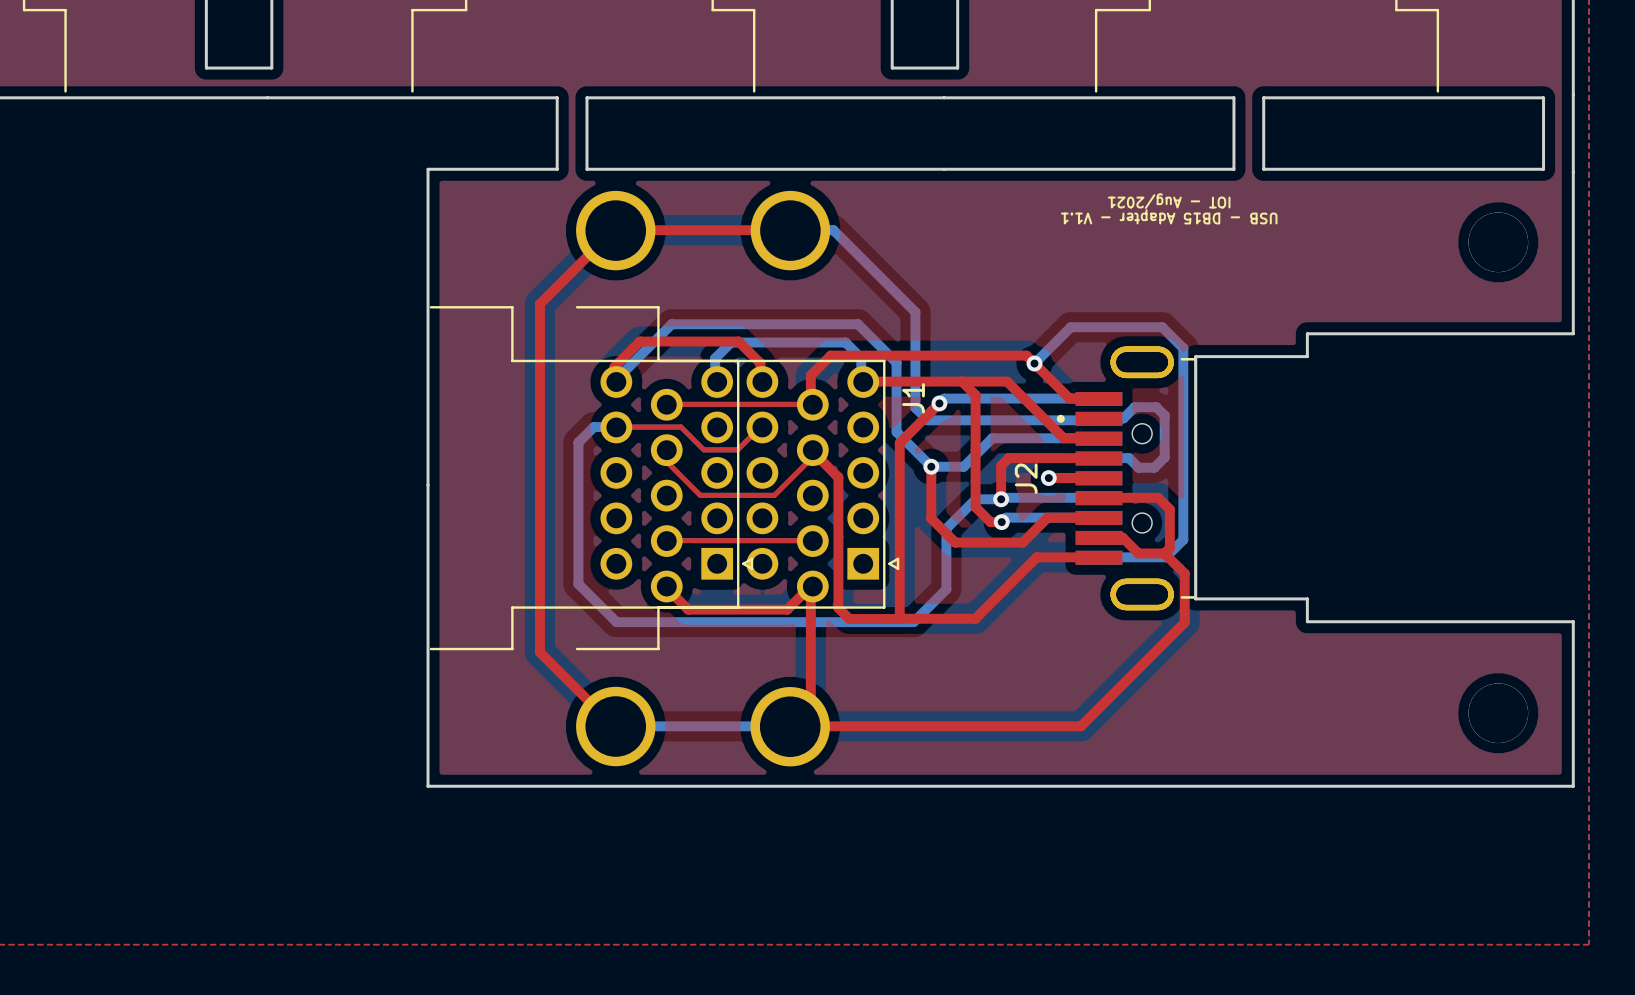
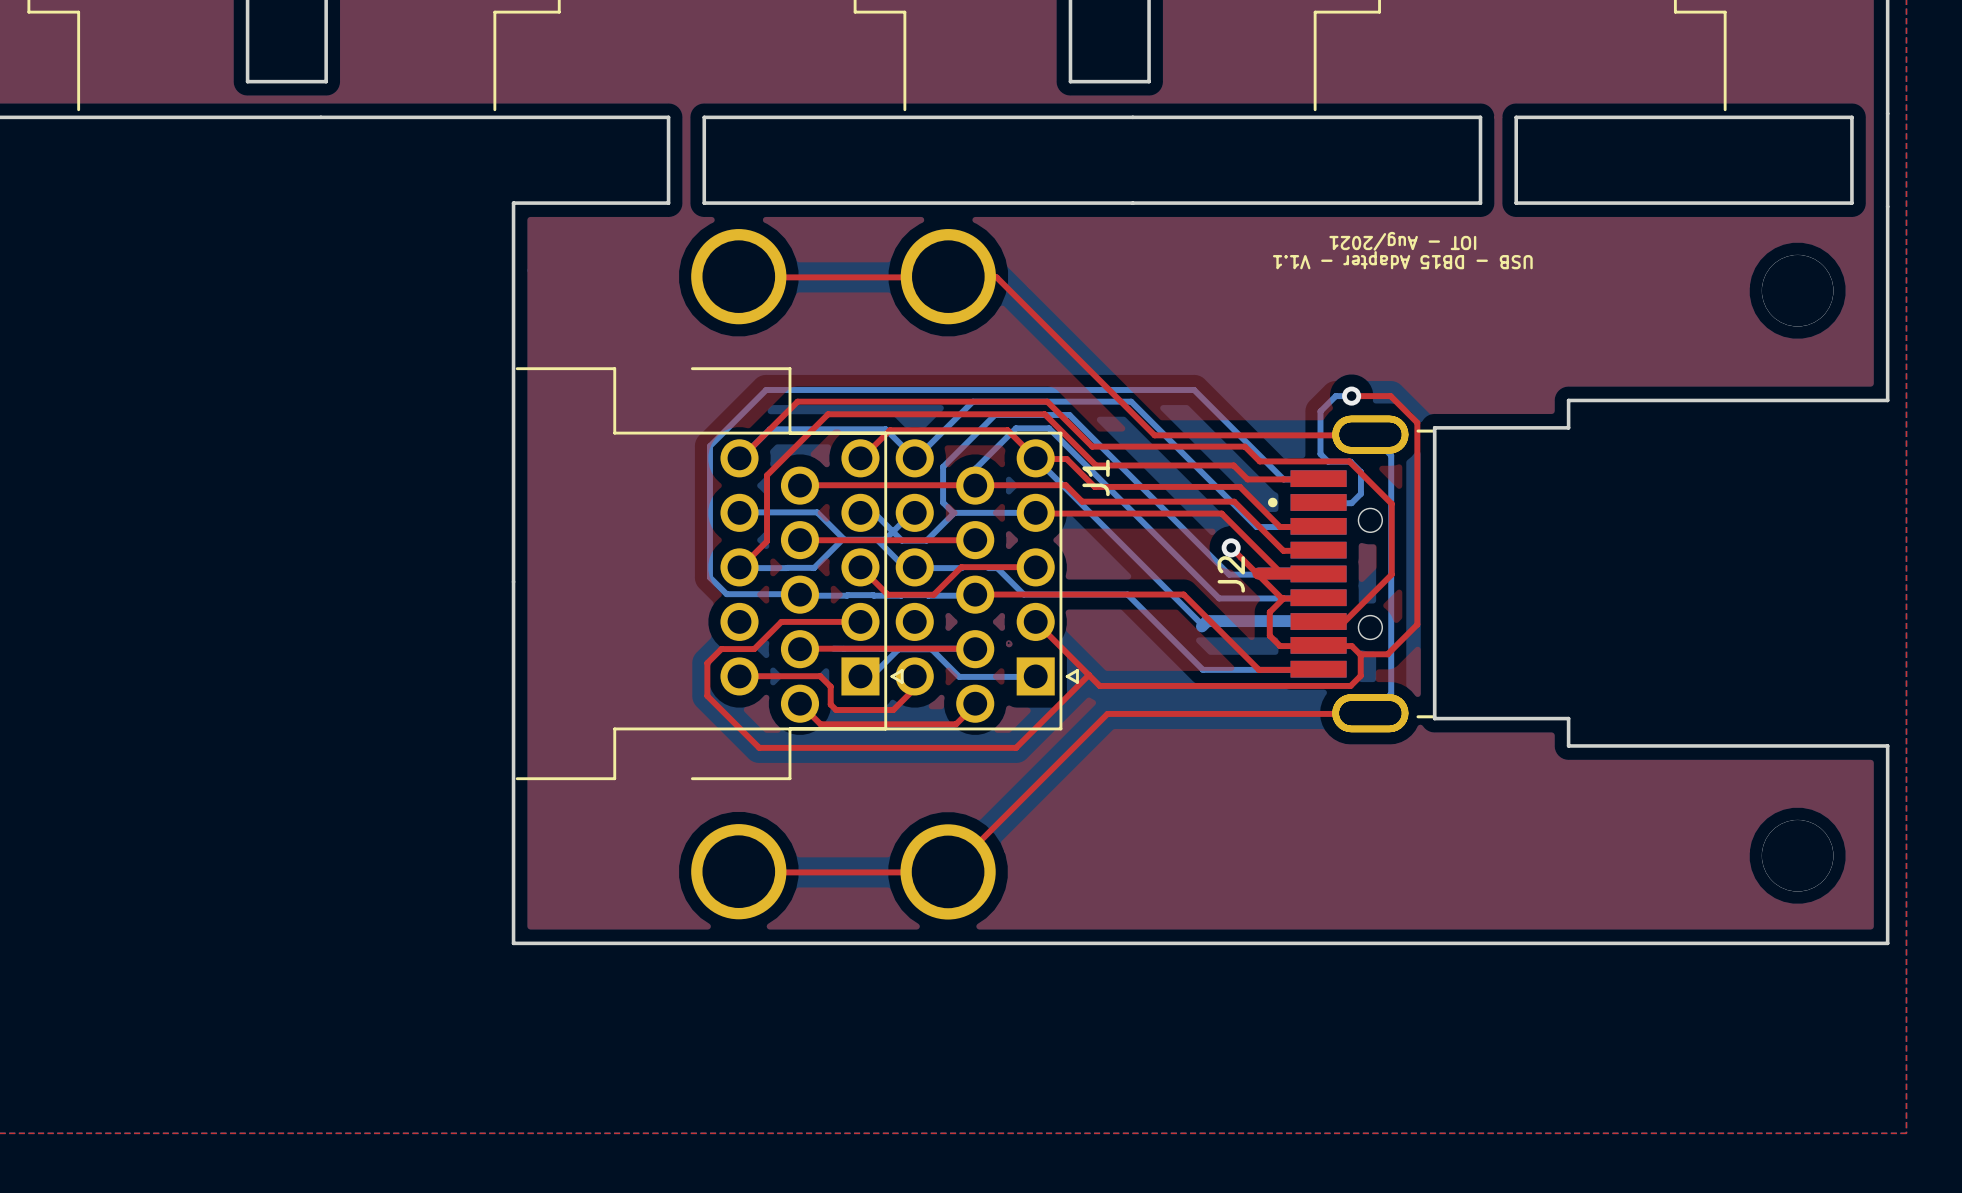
top track: (788, 230) (613, 230) (539, 304) (539, 652) (613, 726) -> none
bottom track: (788, 230) (833, 230) (915, 312) (915, 407) (927, 420) (1095, 420) (1097, 418) (1123, 418) (1134, 407) (1156, 407) (1164, 415) (1164, 457) (1154, 467) (1138, 467) (1129, 458) (1097, 458) -> none
top track: none -> (739, 277) (996, 277) (1154, 435) (1371, 435)
top track: none -> (1351, 396) (1390, 396) (1417, 422) (1417, 624) (1387, 654) (1360, 654) (1351, 646) (1280, 646) (1269, 635) (1269, 612) (1283, 598)
bottom track: none -> (1351, 396) (1335, 396) (1320, 411) (1320, 454) (1328, 461) (1350, 461) (1360, 472) (1360, 493) (1351, 503) (1319, 503)
via: none -> (1351, 396)
bottom track: none -> (1371, 435) (1391, 455) (1391, 693) (1371, 713)
bottom track: (1034, 363) (1070, 327) (1162, 327) (1183, 348) (1183, 539) (1165, 557) (1097, 557) -> none
via: (1034, 363) -> none
top track: (614, 381) (614, 367) (639, 341) (738, 341) (760, 363) (760, 381) -> none
bottom track: (614, 381) (671, 324) (858, 324) (896, 362) (896, 432) (931, 466) (963, 466) (992, 438) (1097, 438) -> none
bottom track: (715, 381) (715, 358) (731, 342) (845, 342) (861, 358) (861, 381) -> none
top track: (861, 381) (1007, 381) (1063, 438) (1097, 438) -> none
top track: (962, 381) (975, 395) (975, 507) (990, 522) (1001, 522) -> none
top track: none -> (740, 459) (797, 401) (1047, 401) (1092, 446) (1244, 446) (1259, 461) (1349, 461) (1391, 503) (1391, 574) (1344, 622) (1319, 622)
bottom track: none -> (740, 459) (769, 429) (885, 429) (915, 459) (972, 401) (1131, 401) (1256, 527) (1319, 527)
top track: none -> (861, 459) (889, 430) (1007, 430) (1036, 459) (1066, 459) (1094, 486) (1239, 486) (1280, 527) (1319, 527)
bottom track: none -> (1036, 459) (1199, 622) (1319, 622)
top track: (1097, 398) (1069, 398) (1026, 355) (830, 355) (810, 375) (810, 404) (664, 404) -> none
bottom track: (1097, 398) (944, 398) (939, 403) -> none
top track: none -> (1319, 479) (1247, 479) (1233, 465) (1095, 465) (1044, 414) (828, 414) (767, 475) (767, 541) (740, 568)
bottom track: none -> (1319, 479) (1283, 479) (1194, 390) (766, 390) (709, 446) (709, 577) (726, 594) (975, 595)
top track: (939, 403) (899, 443) (899, 618) (849, 618) (838, 608) (838, 477) (810, 449) (810, 459) (774, 495) (700, 495) (668, 463) (668, 454) -> none
via: (939, 403) -> none
top track: none -> (800, 486) (1065, 485) (1082, 501) (1234, 501) (1283, 550) (1319, 550)
bottom track: none -> (975, 486) (975, 468) (1015, 428) (1049, 428) (1219, 598) (1319, 598)
top track: (614, 427) (681, 427) (703, 449) (737, 449) (760, 427) -> none
bottom track: (614, 427) (593, 427) (578, 442) (578, 584) (616, 622) (913, 622) (946, 589) (946, 528) (975, 499) (1097, 497) -> none
bottom track: none -> (953, 513) (943, 502) (943, 466) (994, 415) (1069, 415) (1229, 574) (1319, 574)
bottom track: none -> (861, 513) (874, 513) (901, 540) (926, 540) (954, 512) (1036, 513)
top track: none -> (1036, 513) (1221, 513) (1282, 574) (1319, 574)
top track: none -> (800, 540) (975, 540)
top track: none -> (1231, 547) (1281, 598) (1319, 598)
via: none -> (1231, 547)
top track: (1097, 458) (1008, 458) (1001, 465) (1001, 499) -> none
top track: (931, 466) (931, 518) (955, 542) (1022, 542) (1047, 517) (1097, 517) -> none
via: (931, 466) -> none
bottom track: none -> (740, 568) (786, 568)
bottom track: none -> (787, 567) (812, 567)
bottom track: none -> (813, 568) (842, 540) (877, 540) (905, 568) (962, 568)
top track: none -> (861, 568) (887, 594) (933, 594) (961, 567) (1036, 568)
bottom track: none -> (988, 568) (997, 568) (1023, 594) (1127, 594) (1202, 669) (1319, 669)
via: (1048, 478) -> none
top track: none -> (975, 595) (1183, 594) (1258, 669) (1319, 669)
top track: (1097, 497) (1158, 497) (1169, 509) (1169, 548) (1164, 553) -> none
via: (1001, 499) -> none
top track: none -> (861, 622) (781, 621) (754, 649) (721, 649) (707, 663) (707, 695) (759, 747) (1016, 747) (1088, 675)
top track: none -> (1036, 622) (1099, 685) (1350, 685) (1360, 675) (1360, 655)
via: (1001, 522) -> none
top track: (1097, 537) (1122, 537) (1138, 553) (1164, 553) -> none
top track: (1164, 553) (1184, 573) (1184, 622) (1080, 726) (788, 726) (810, 703) (810, 586) (787, 609) (688, 609) (664, 586) -> none
top track: (1097, 557) (1036, 557) (975, 618) (899, 618) -> none
top track: none -> (740, 677) (820, 676) (830, 686) (830, 704) (836, 710) (893, 710) (915, 687) (915, 677)
bottom track: none -> (1036, 676) (959, 676) (931, 649) (898, 649) (870, 677) (861, 677)
top track: none -> (800, 704) (820, 724) (956, 724) (975, 704)
top track: none -> (1371, 713) (1107, 713) (948, 872)
bottom track: (613, 726) (788, 726) -> none
top track: none -> (739, 872) (948, 872)

